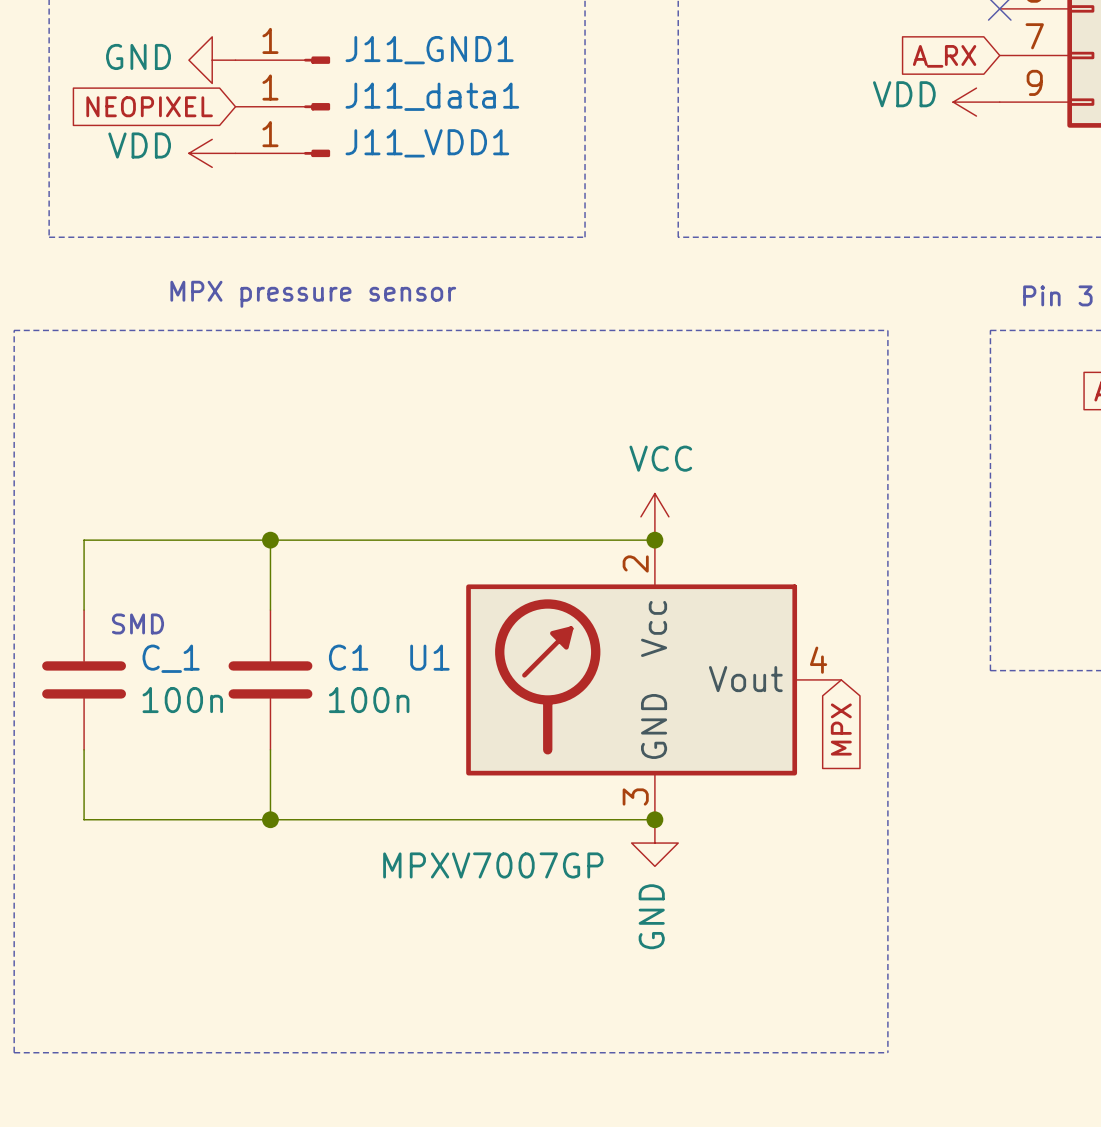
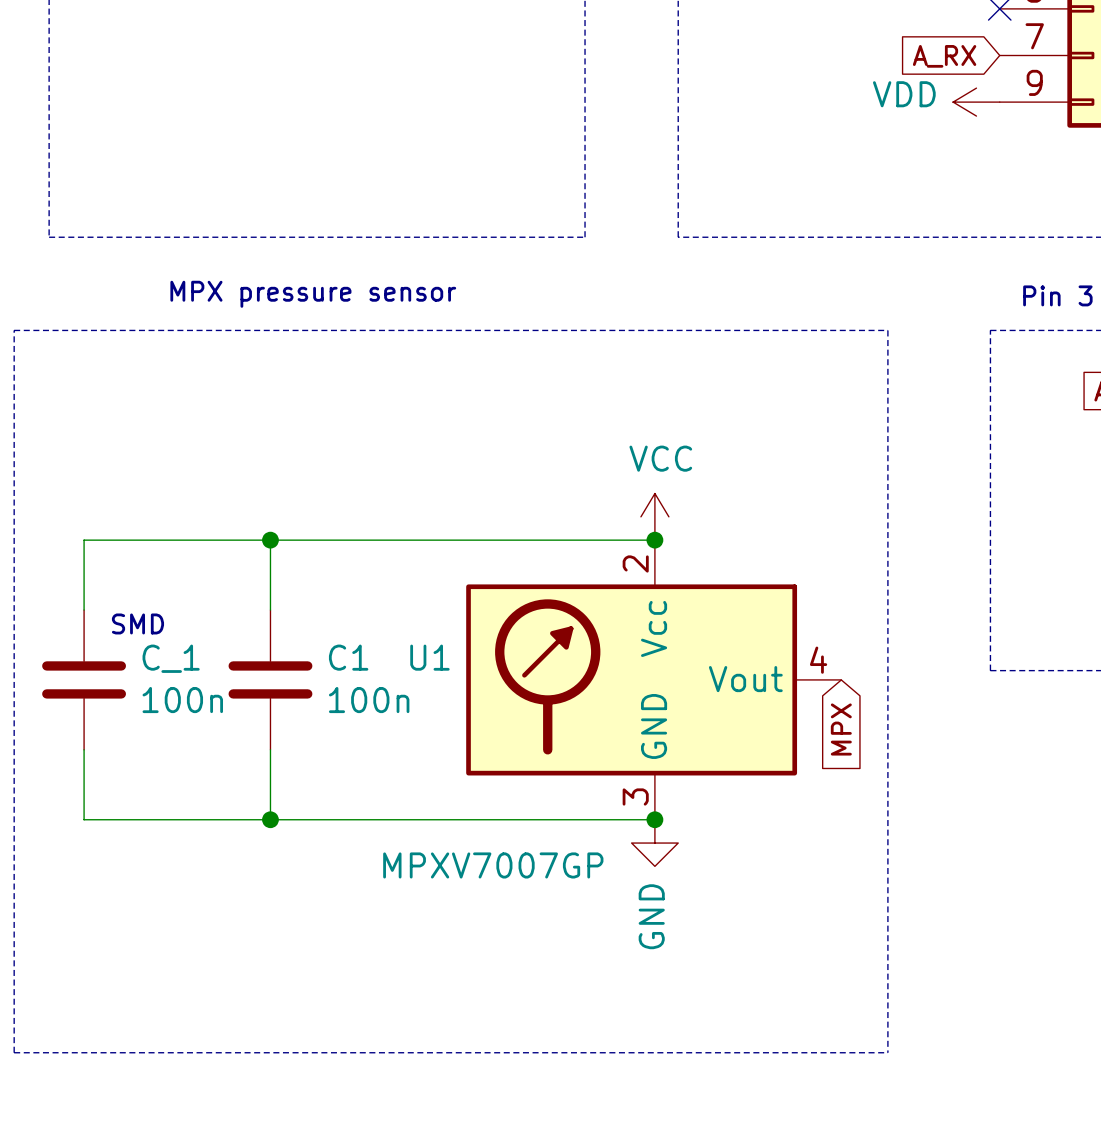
power symbol: GND (212, 60) -> none
J11_GND1: (282, 60) -> none
global label: NEOPIXEL (149, 106) -> none
J11_data1: (282, 106) -> none
power symbol: VDD (212, 153) -> none
J11_VDD1: (282, 153) -> none

